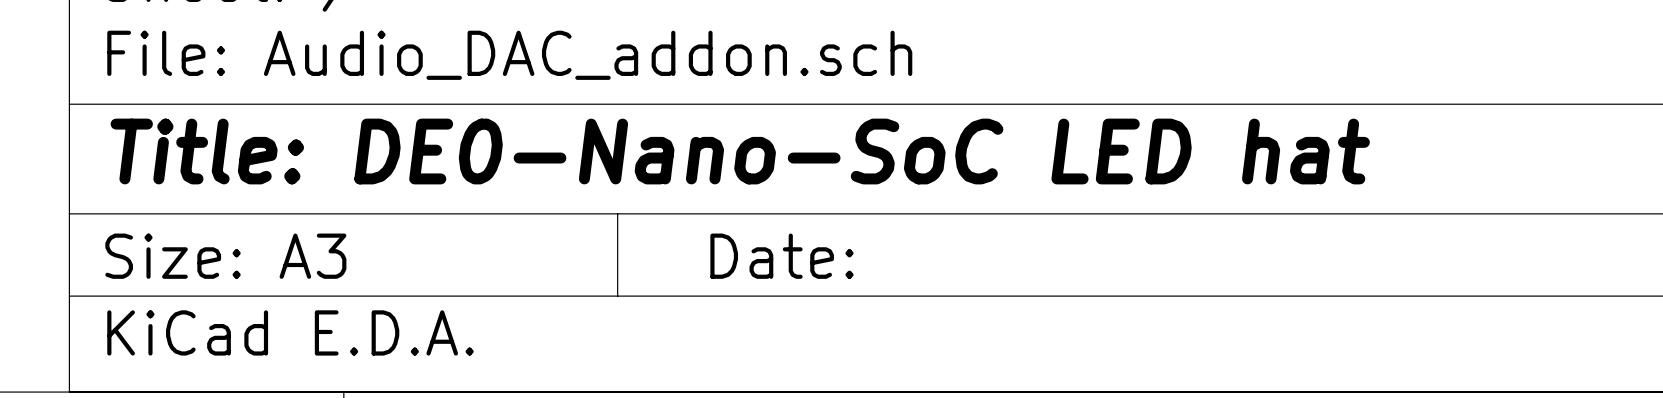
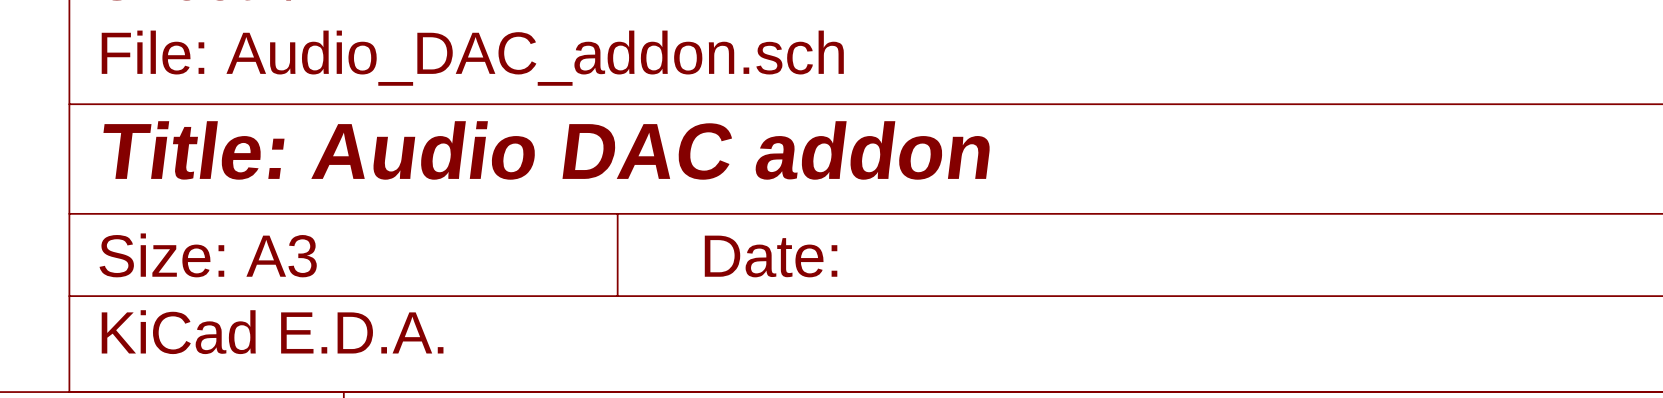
title block: Title: DE0-Nano-SoC LED hat (740, 151) -> Title: Audio DAC addon (546, 150)

